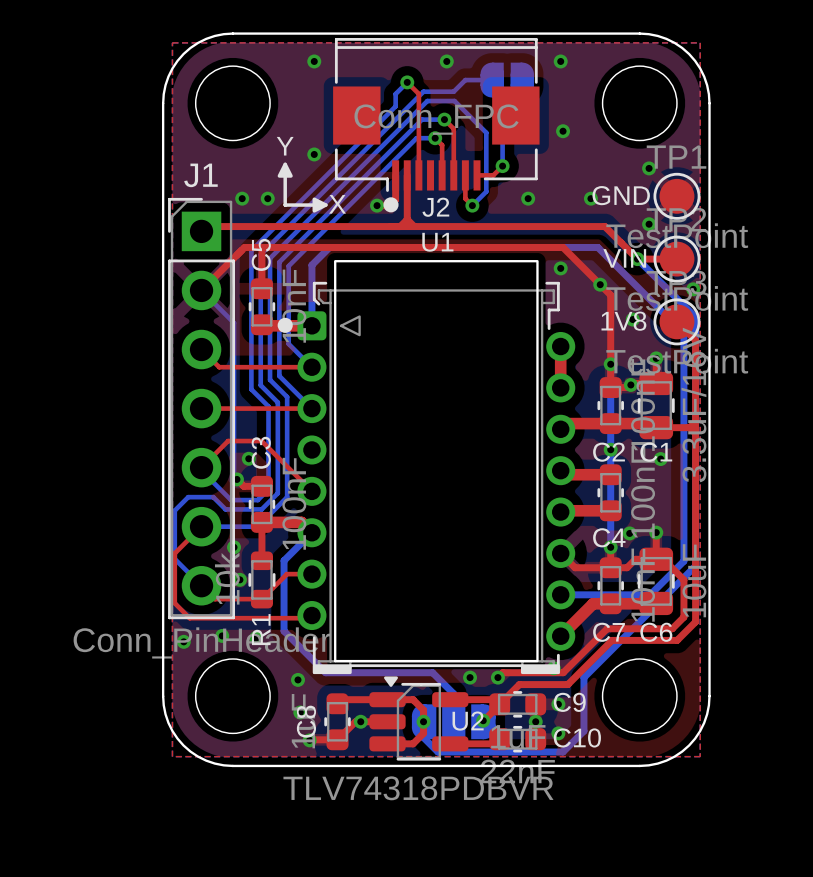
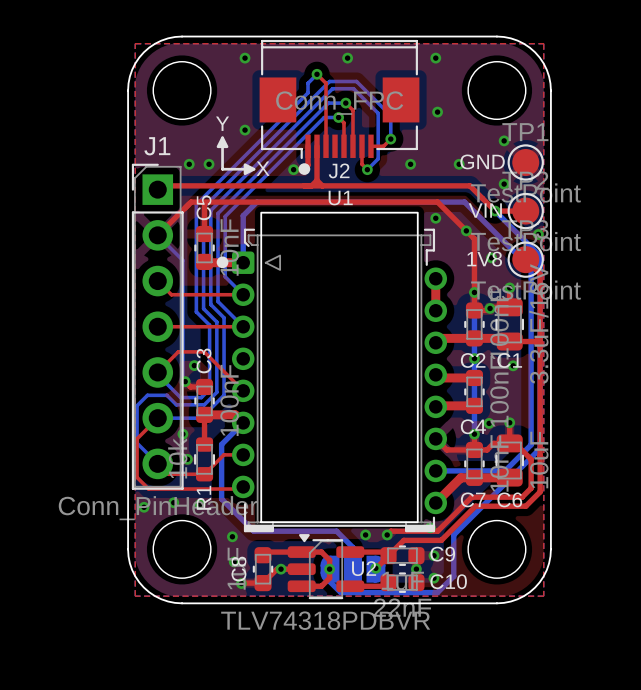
bottom track: (492, 80) (465, 80) (453, 91) -> (390, 115) (356, 81) (352, 81)
part: (507, 80) -> none

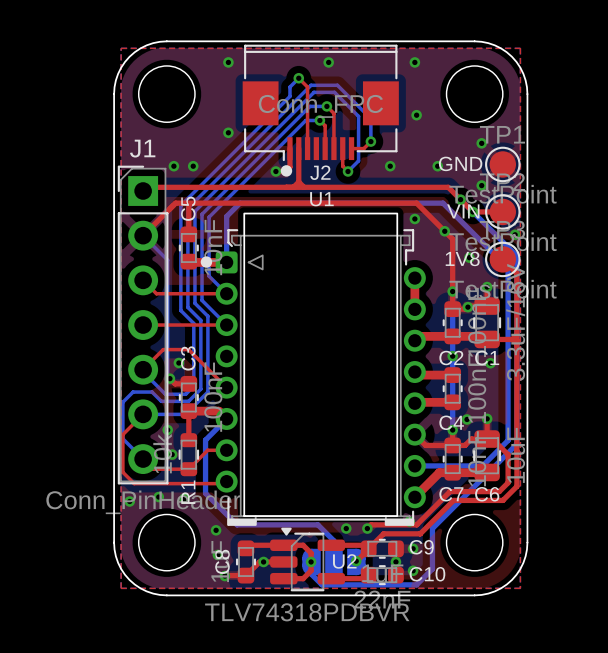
text: Y (222, 123) -> none
drawing: [216, 136, 229, 149] -> none
line: (222, 137) (222, 169) (254, 169) -> none
drawing: [243, 163, 256, 176] -> none
text: X (263, 168) -> none
via: none -> (460, 199)

